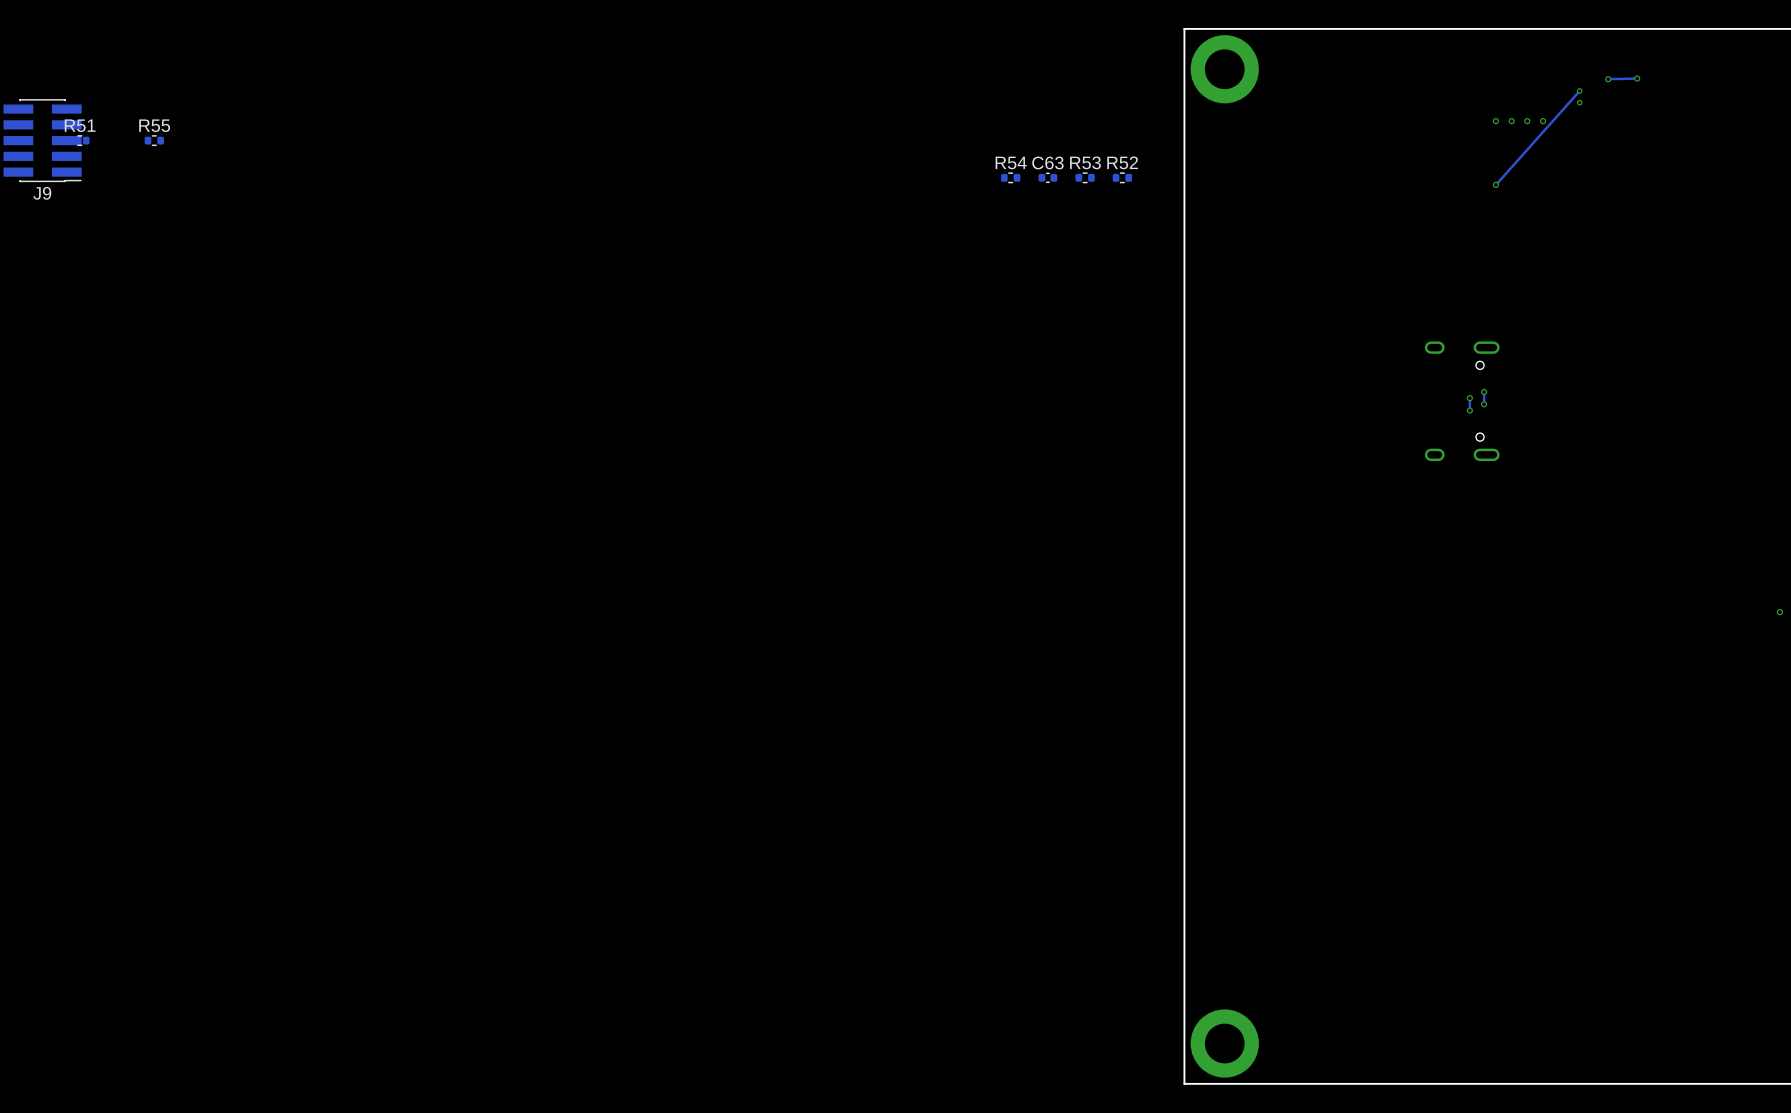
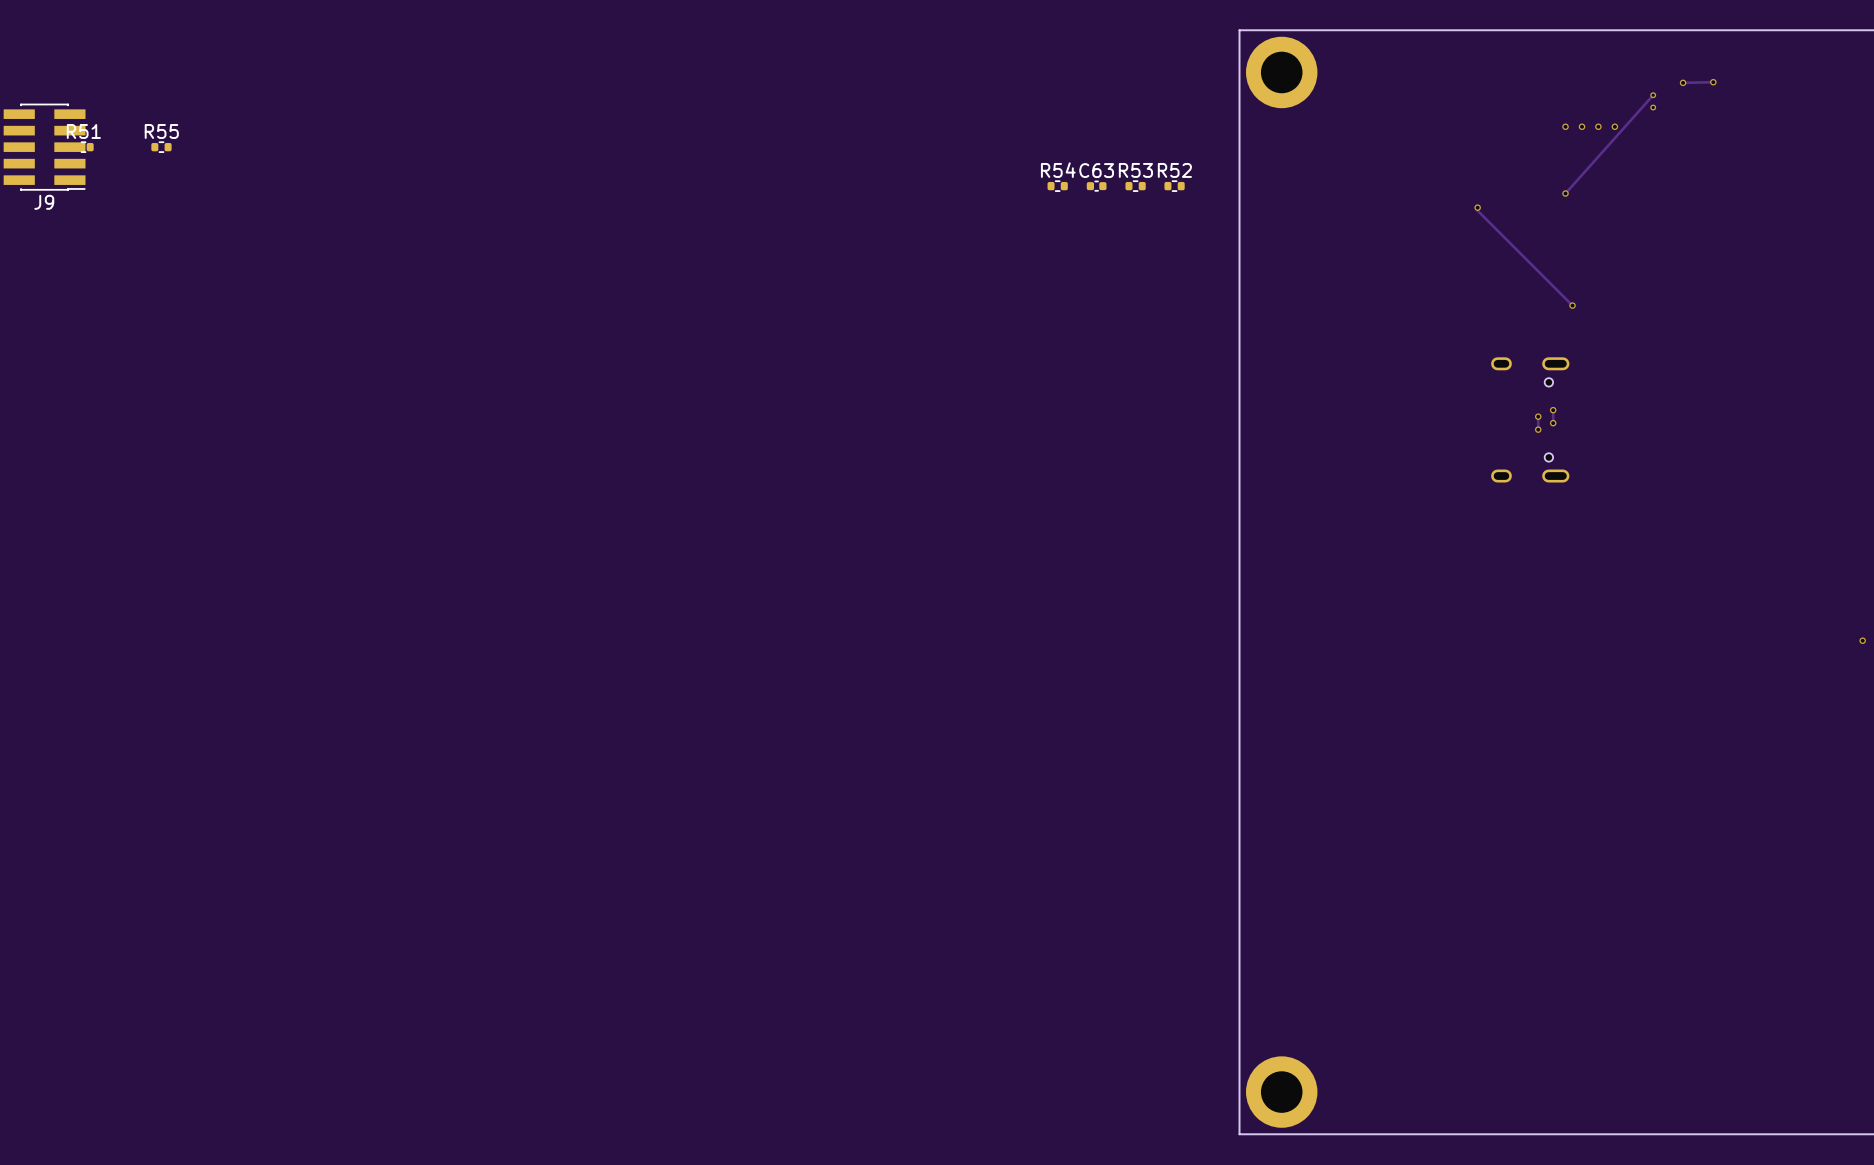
track: none -> (1477, 207) (1477, 210) (1572, 305)
via: none -> (1477, 207)
via: none -> (1572, 305)

